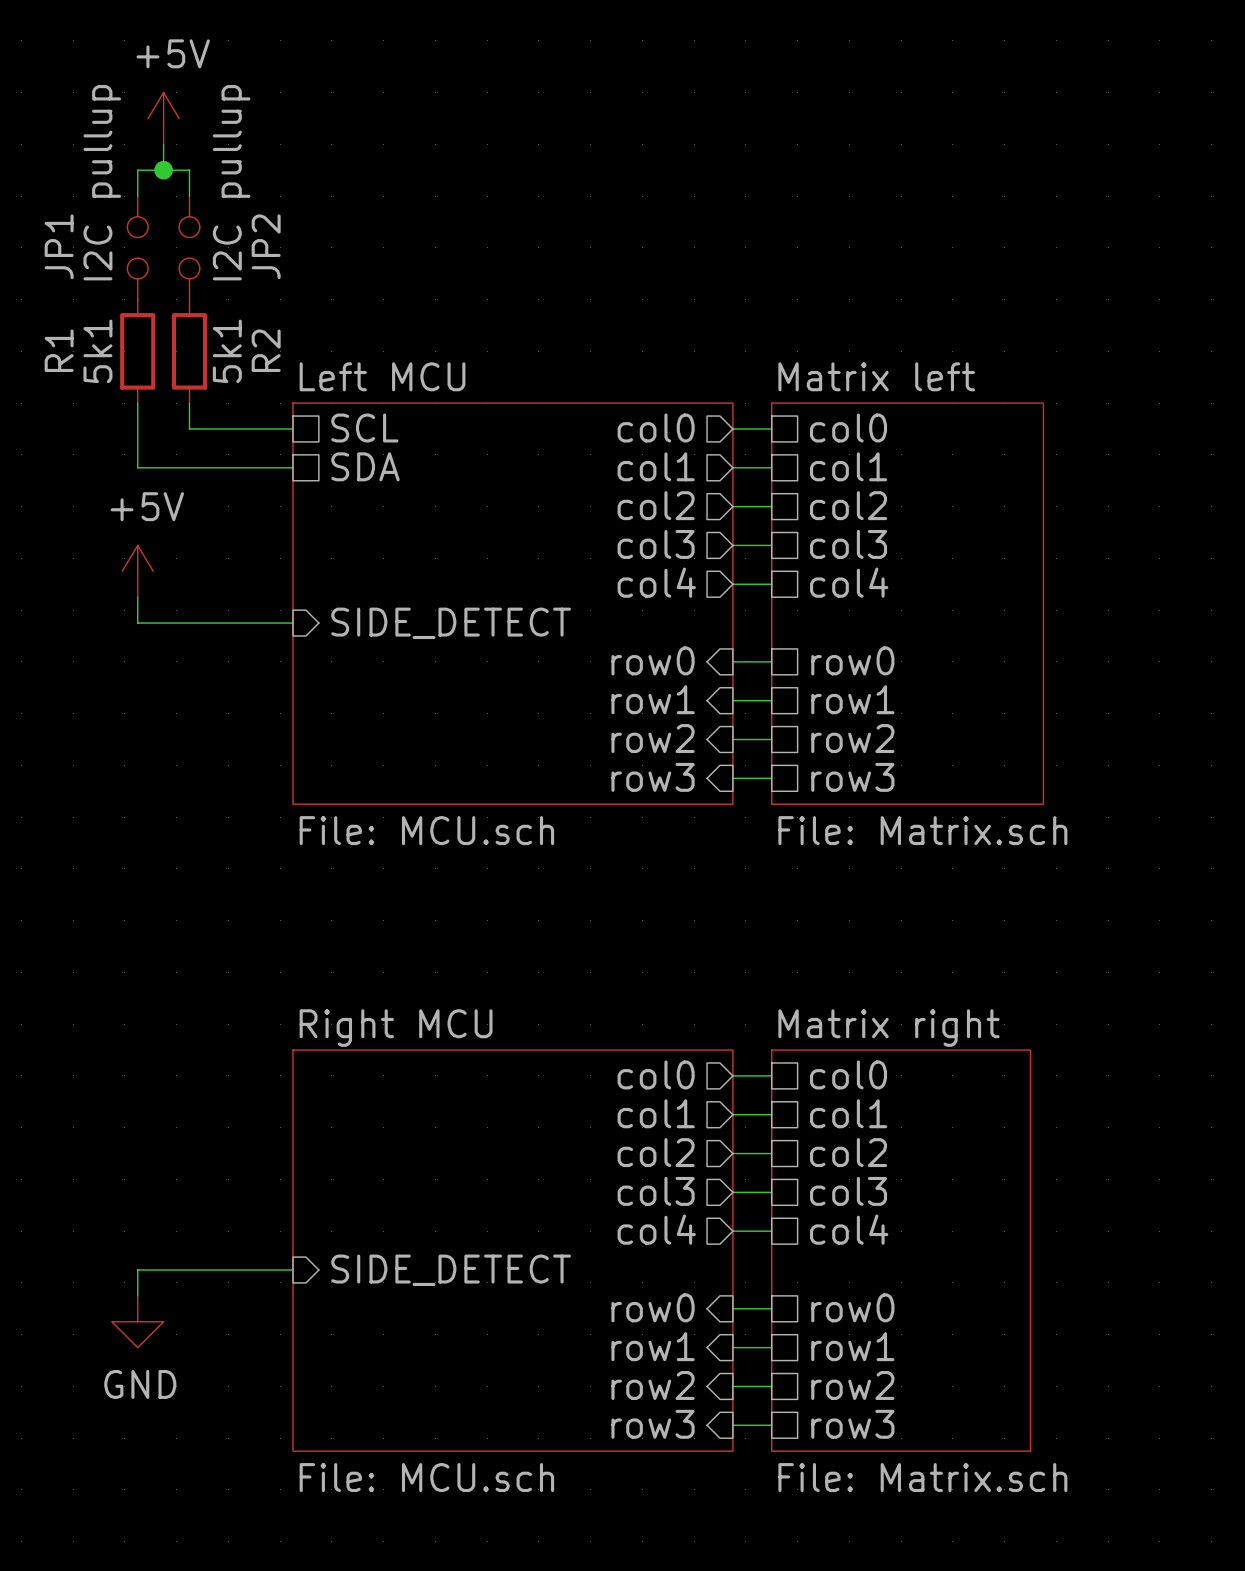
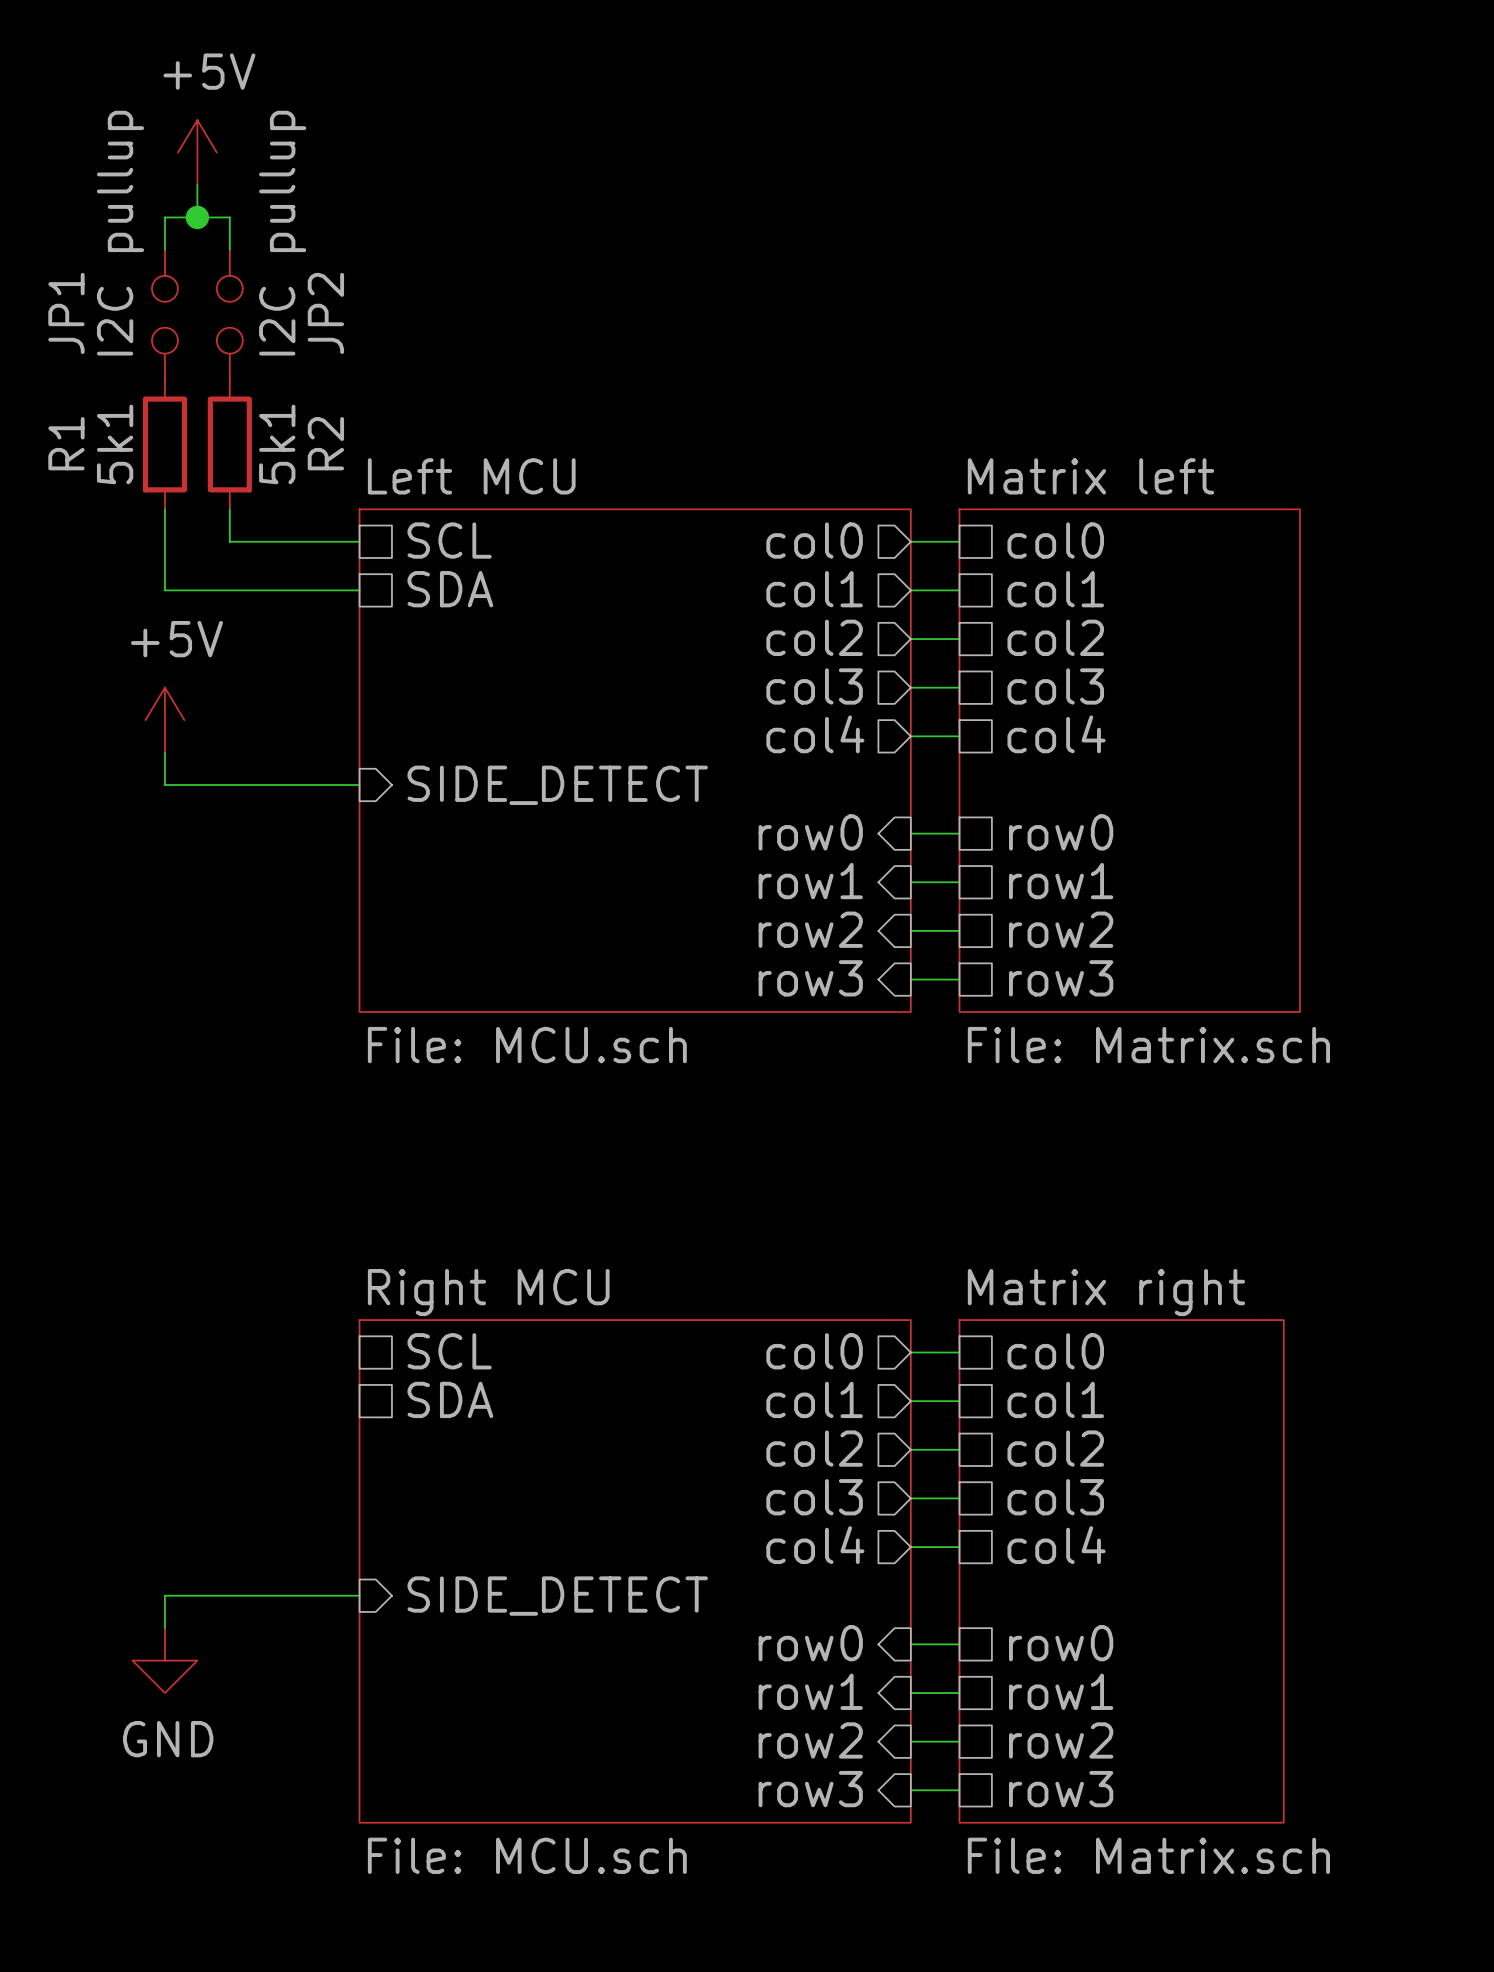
sheet pin: none -> SCL (449, 1351)
sheet pin: none -> SDA (450, 1399)

